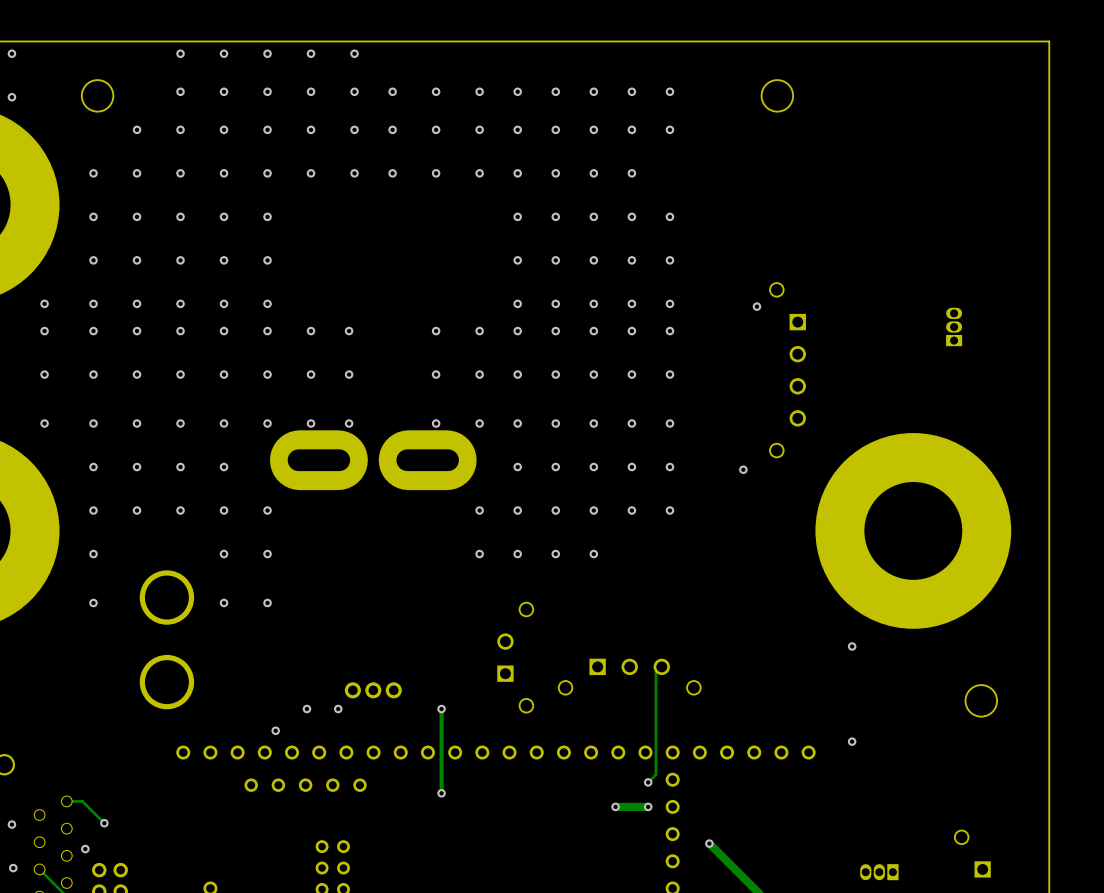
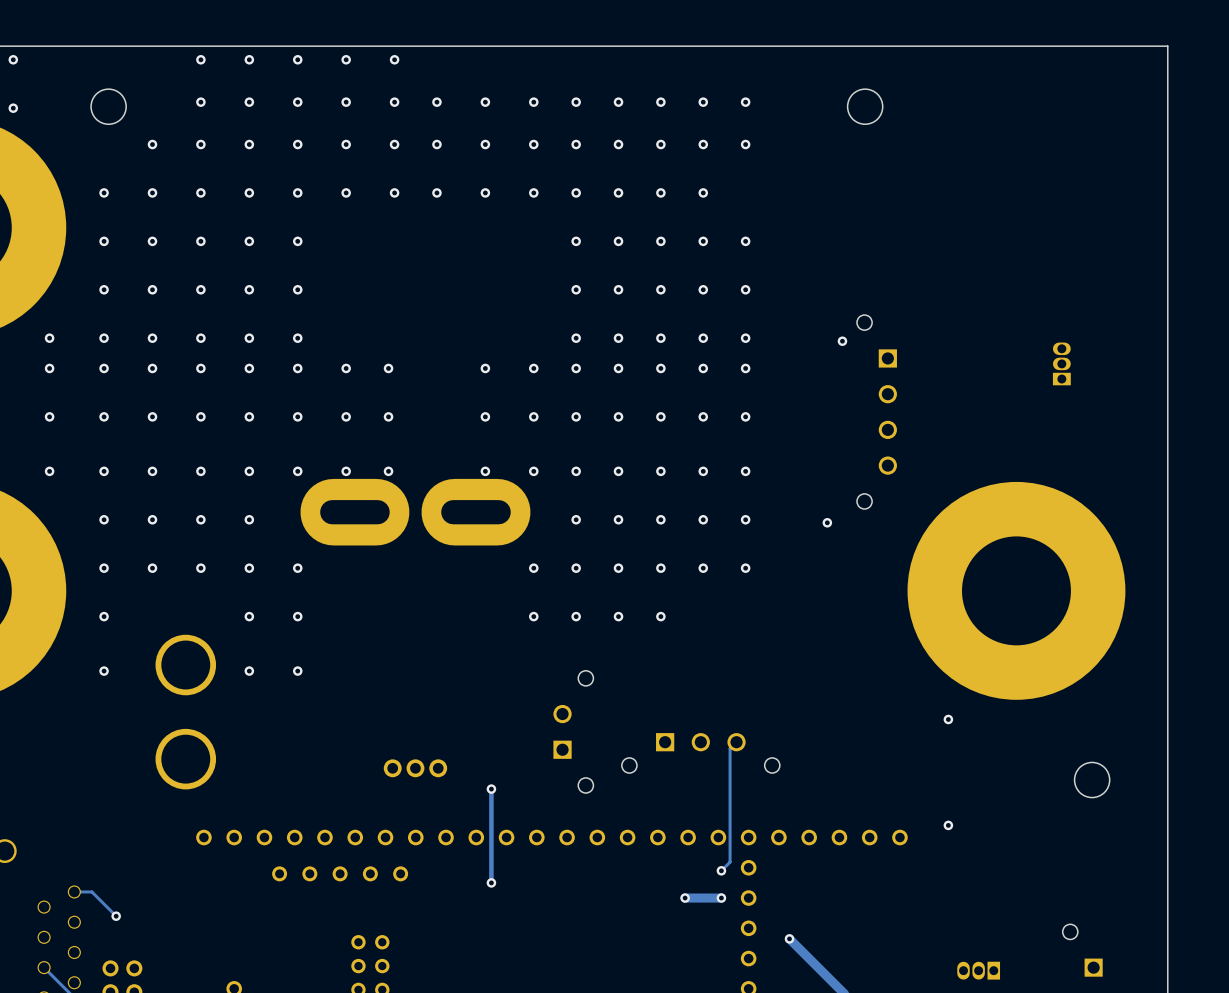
via: (306, 709) -> none
via: (338, 709) -> none
via: (275, 730) -> none
via: (11, 824) -> none
via: (85, 849) -> none
via: (13, 868) -> none

